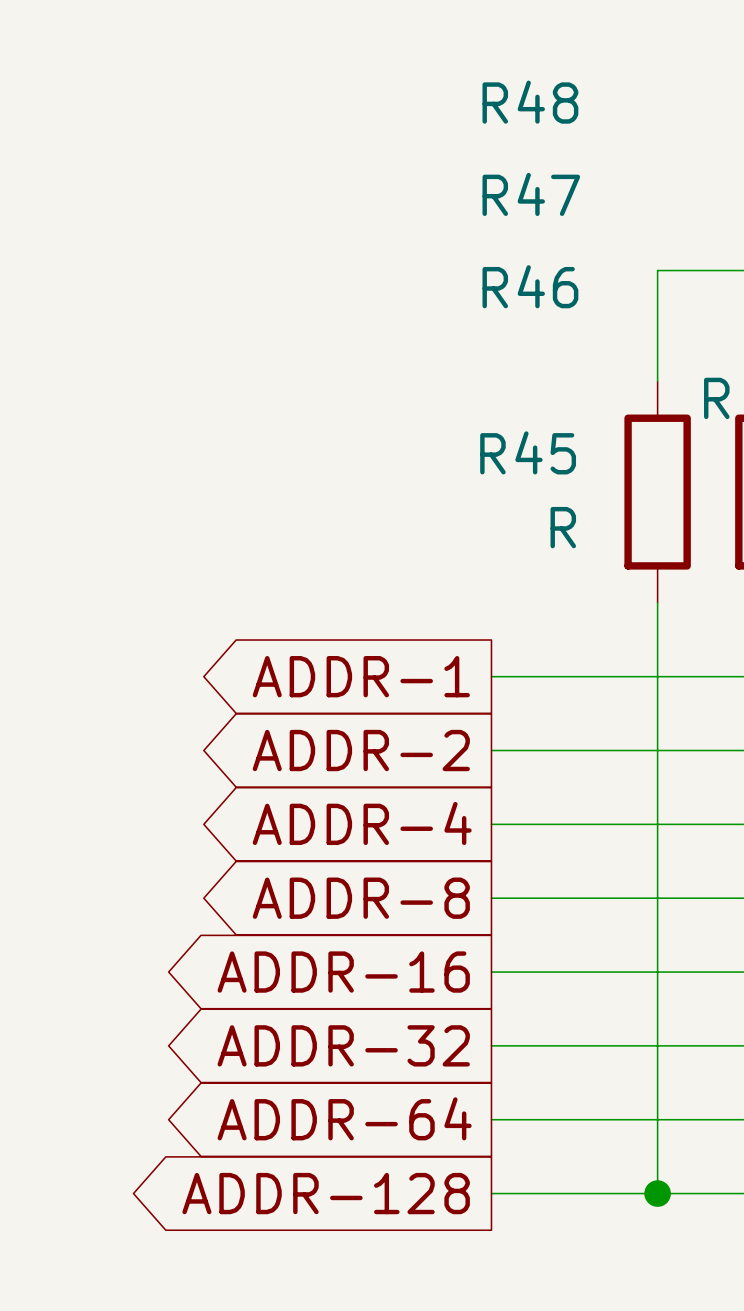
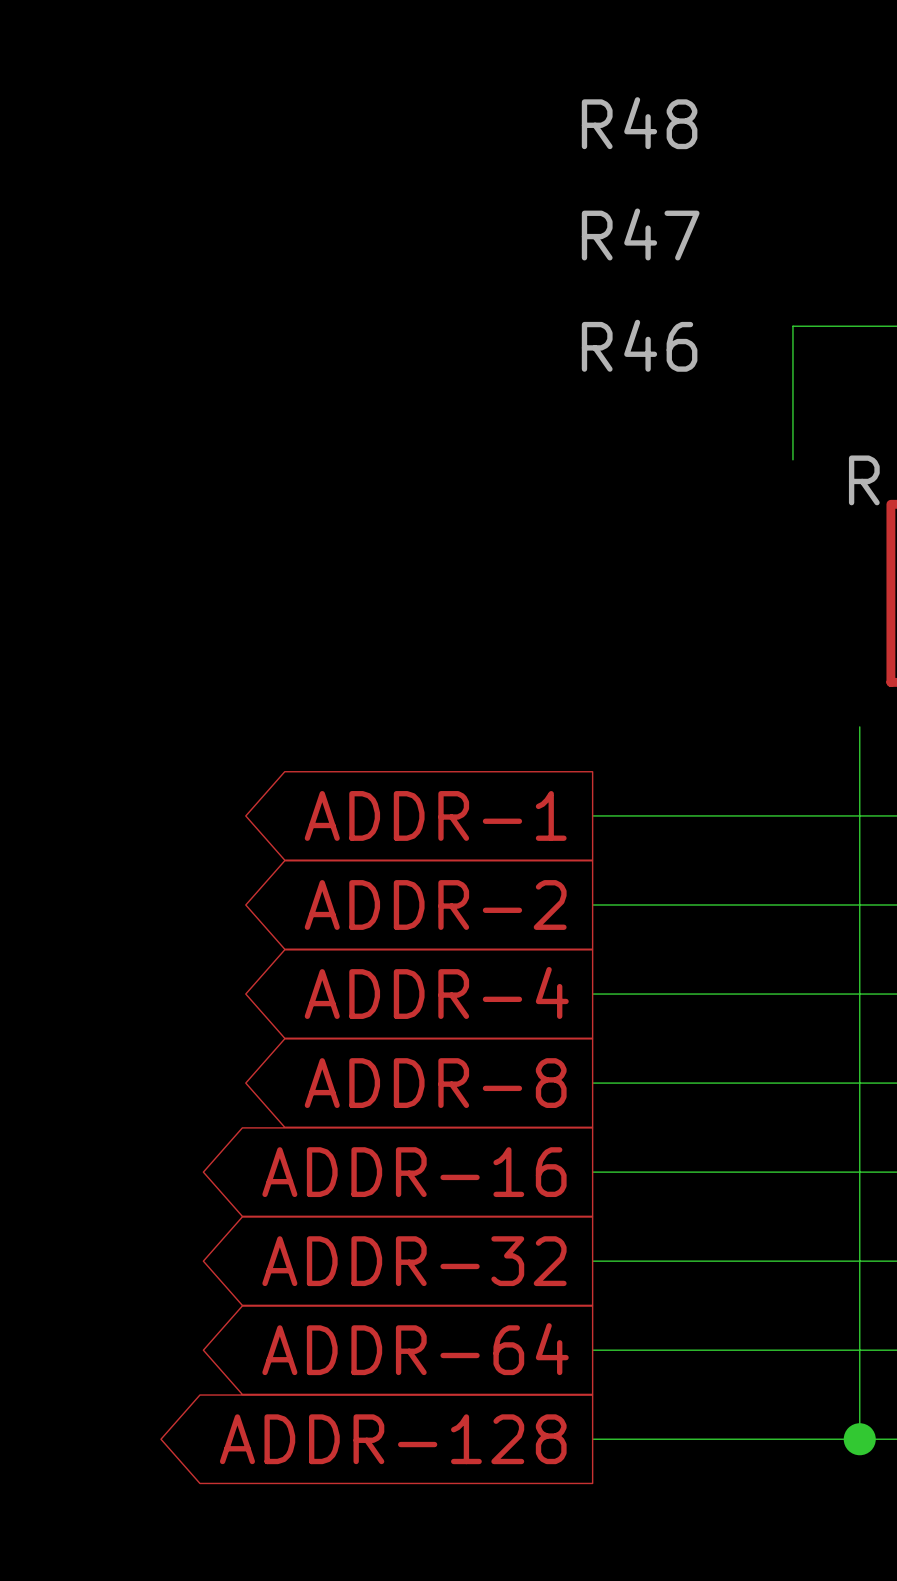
R45: R (657, 492) -> none
wire: (657, 602) (657, 1193) -> (859, 726) (859, 1439)
junction: (657, 1193) -> none
junction: none -> (859, 1439)

